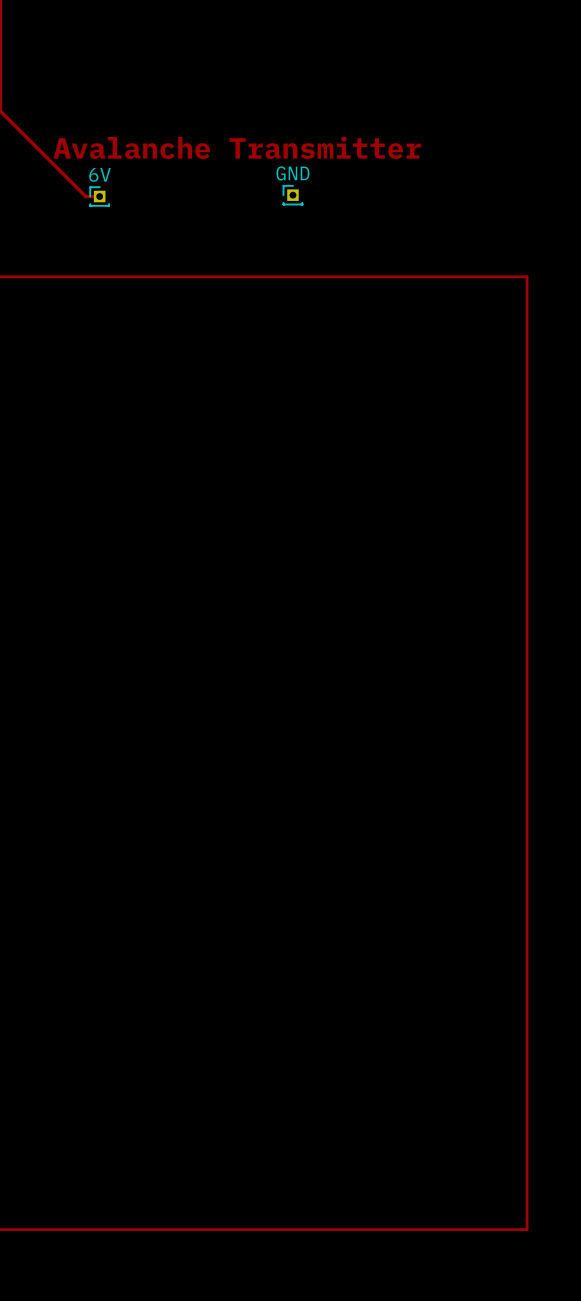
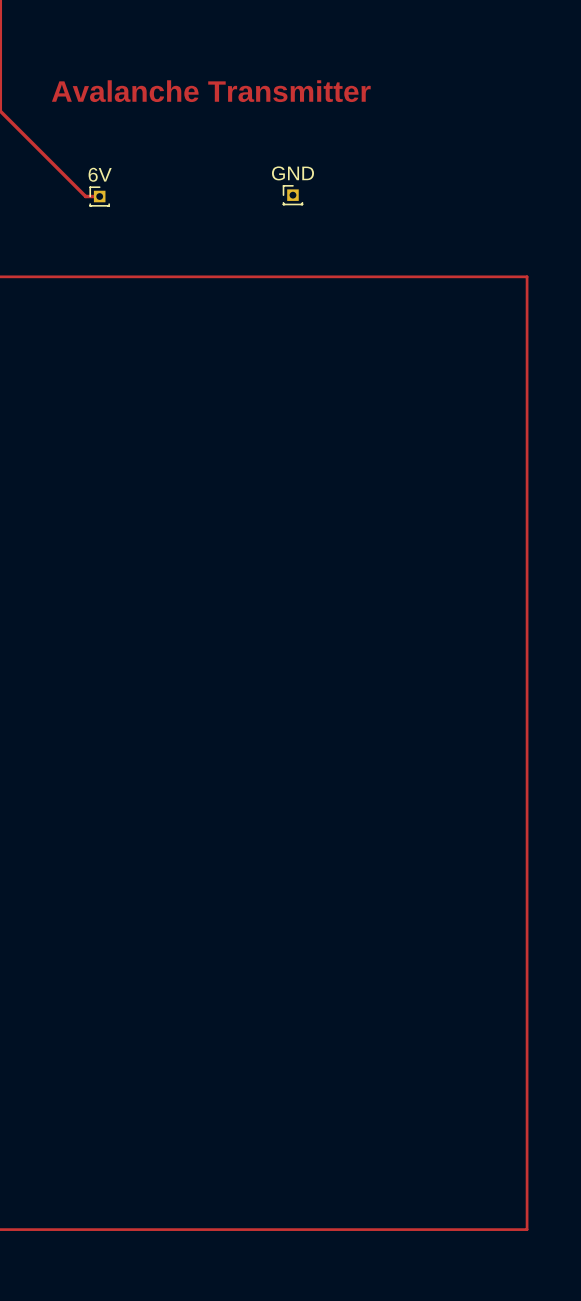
text position: Avalanche Transmitter (237, 147) -> Avalanche Transmitter (211, 91)

